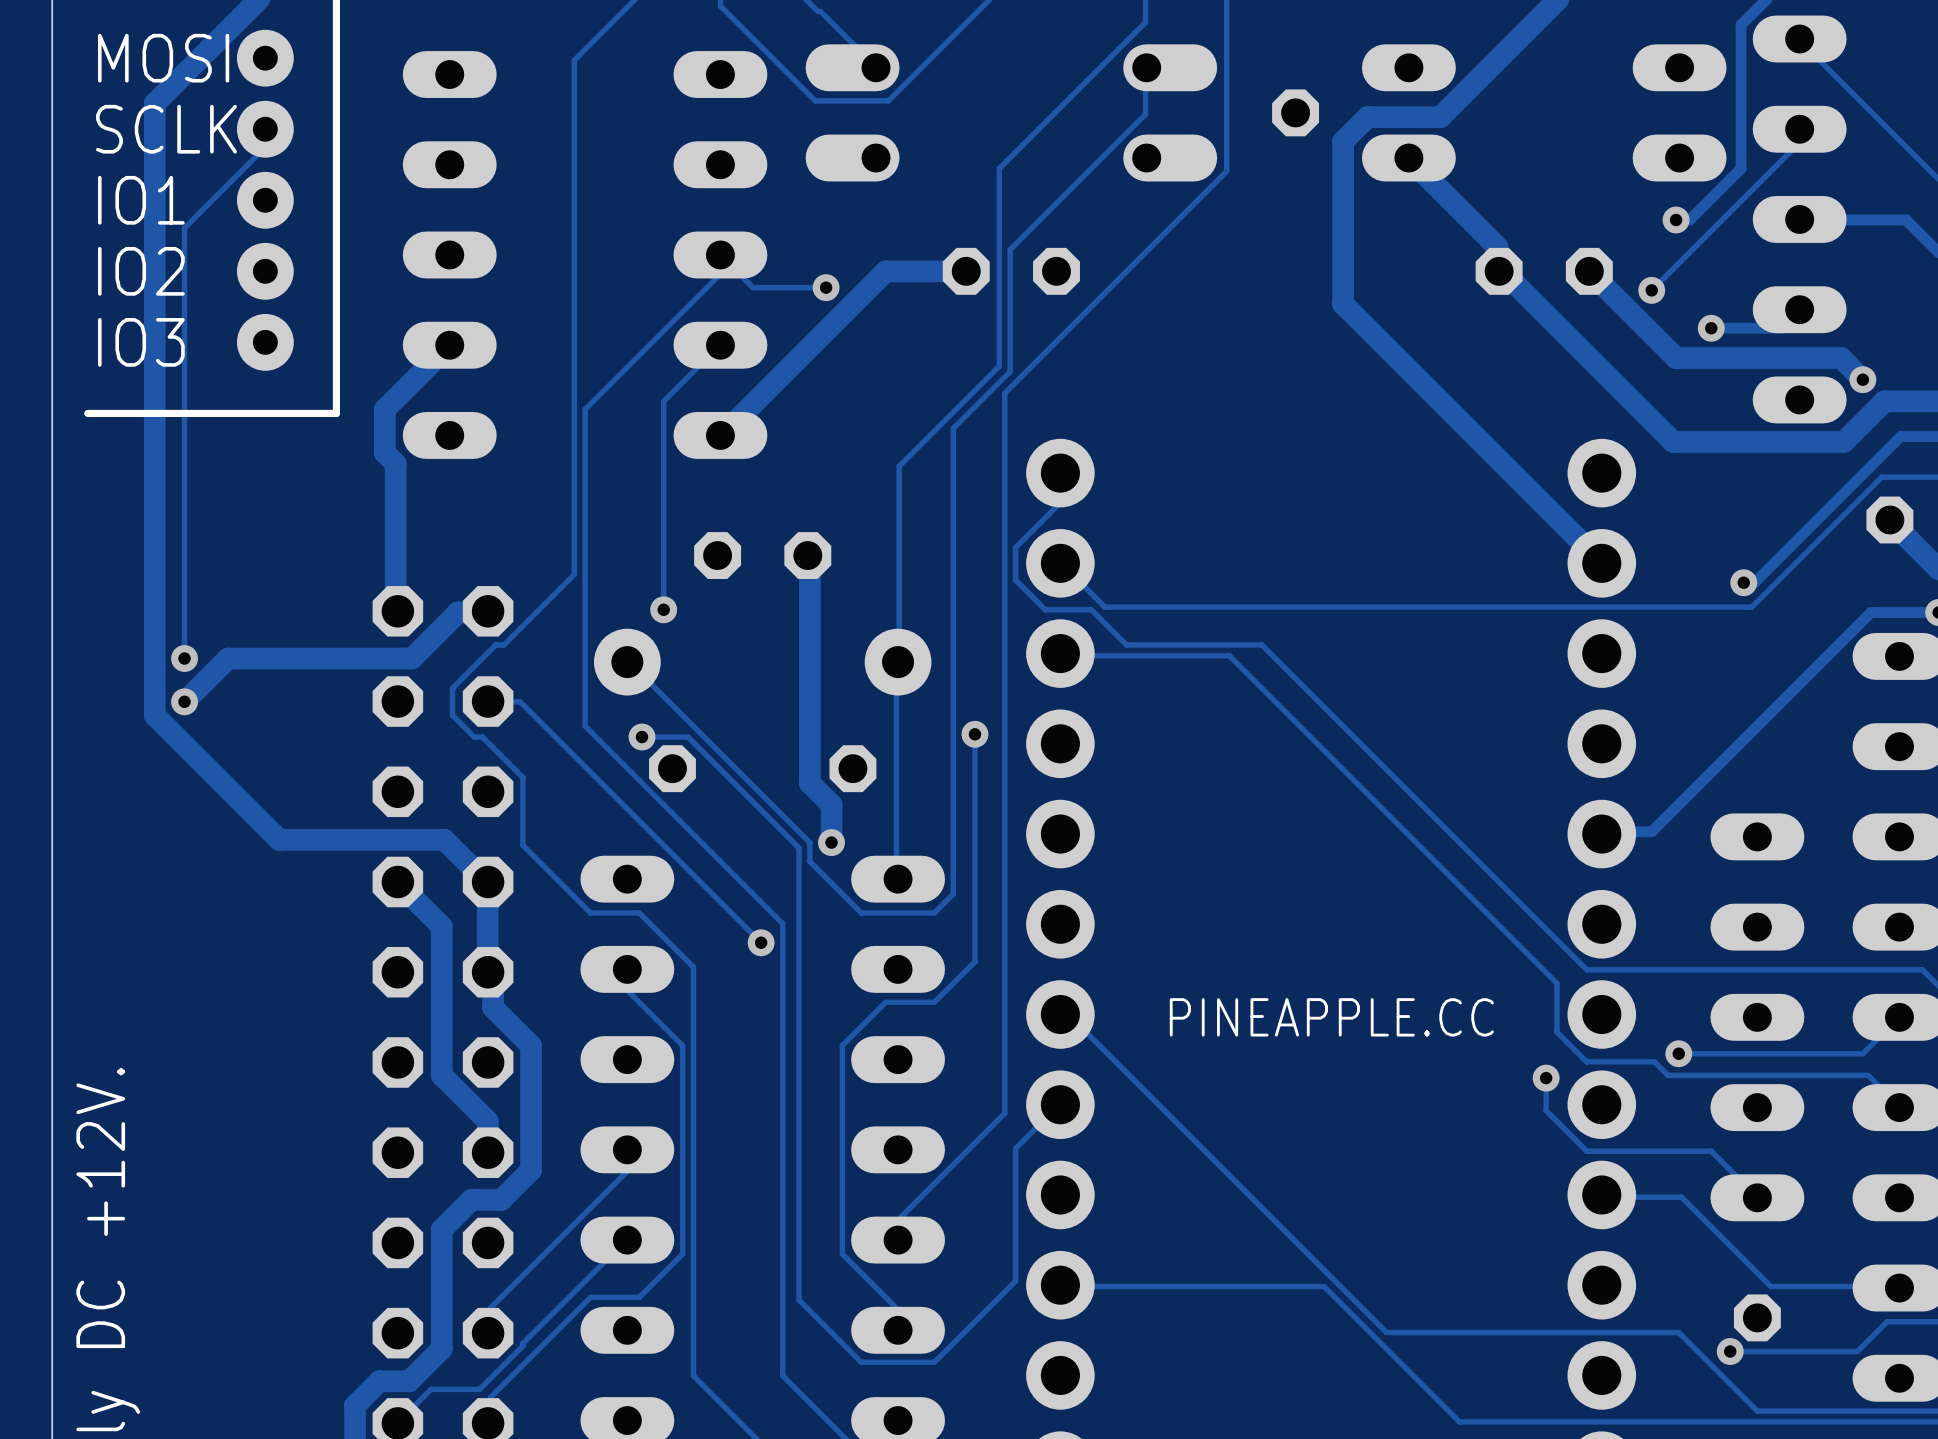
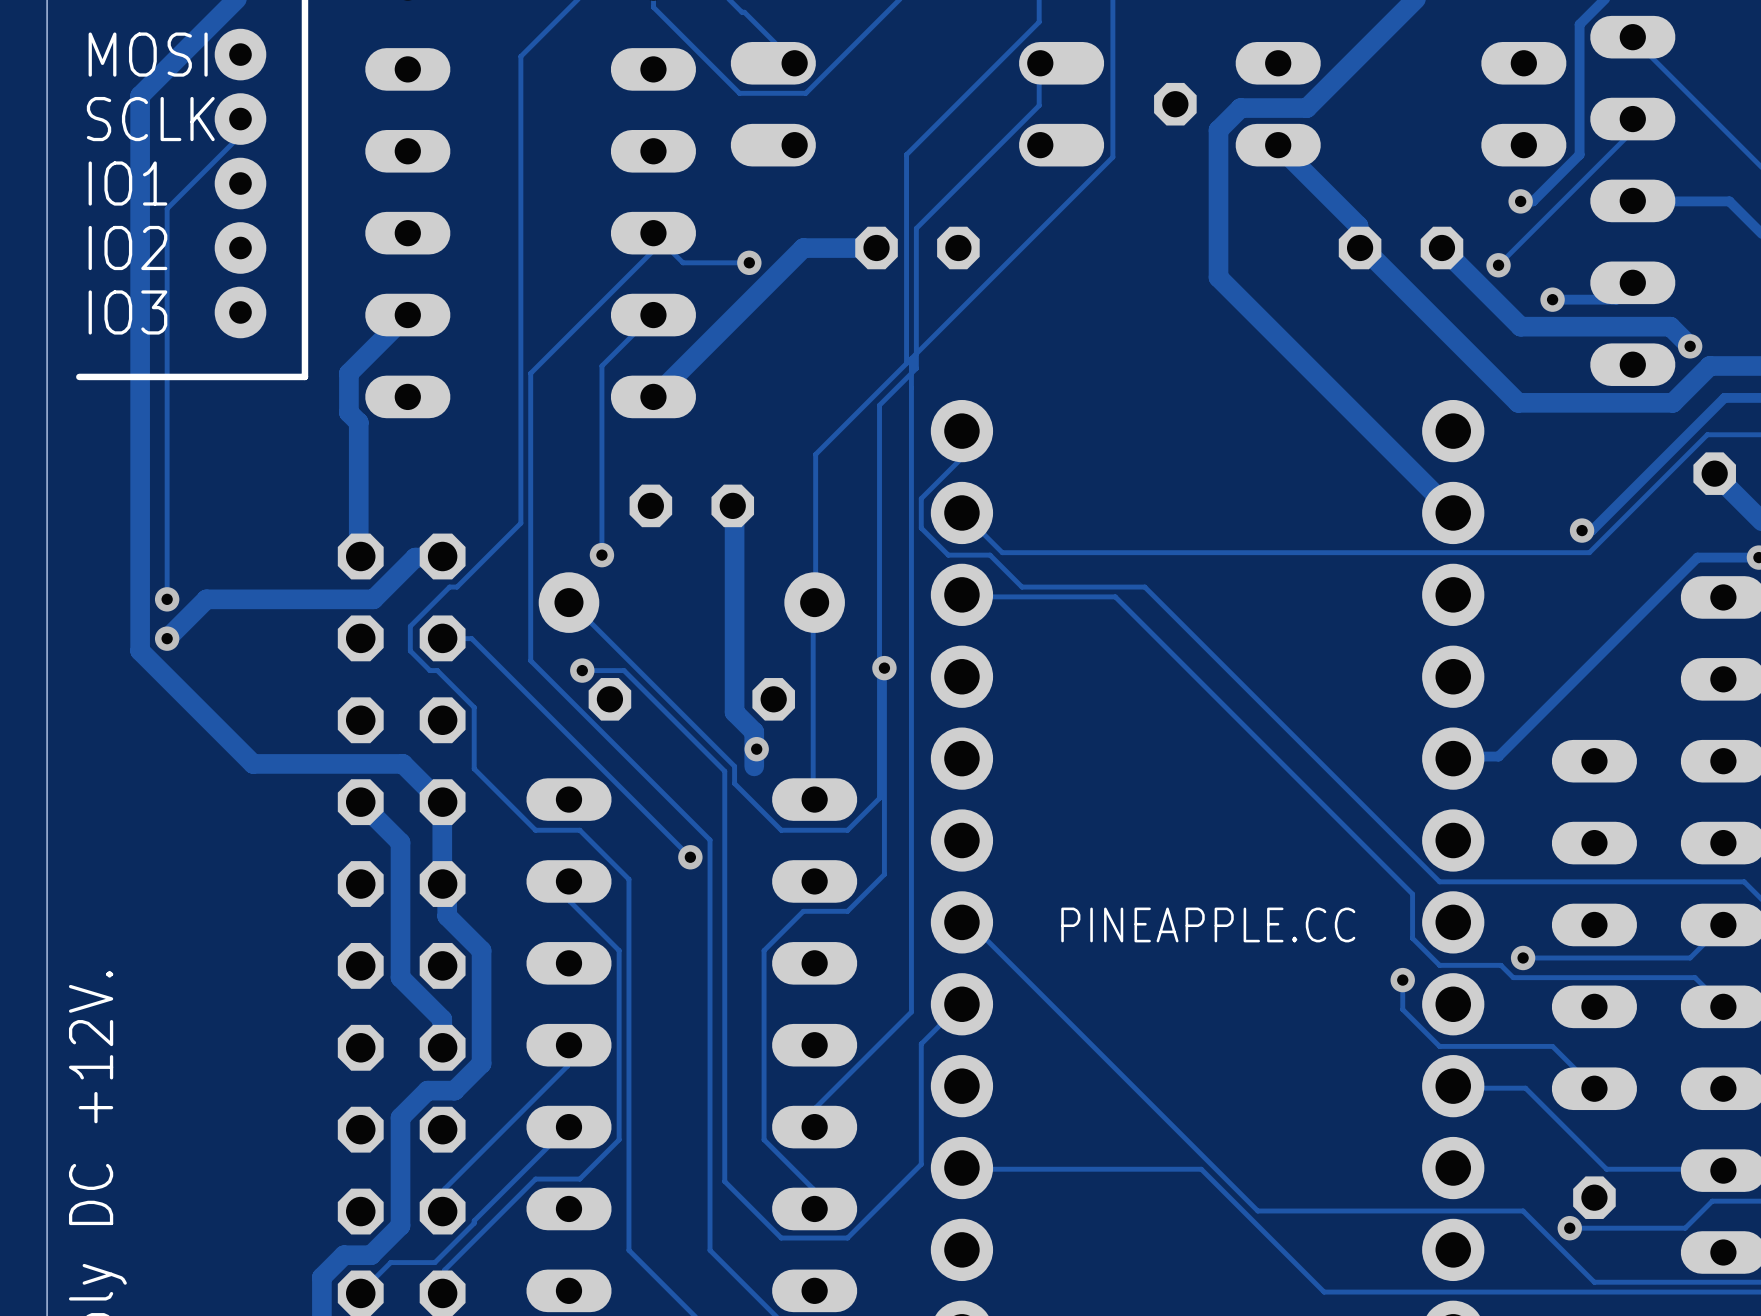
track: (999, 366) (899, 466) (899, 498) -> (906, 334) (906, 363) (815, 454)
track: (1010, 371) (953, 428) (953, 894) -> (916, 338) (916, 368) (879, 405) (879, 798) (864, 813)
via position: (831, 842) -> (756, 749)

